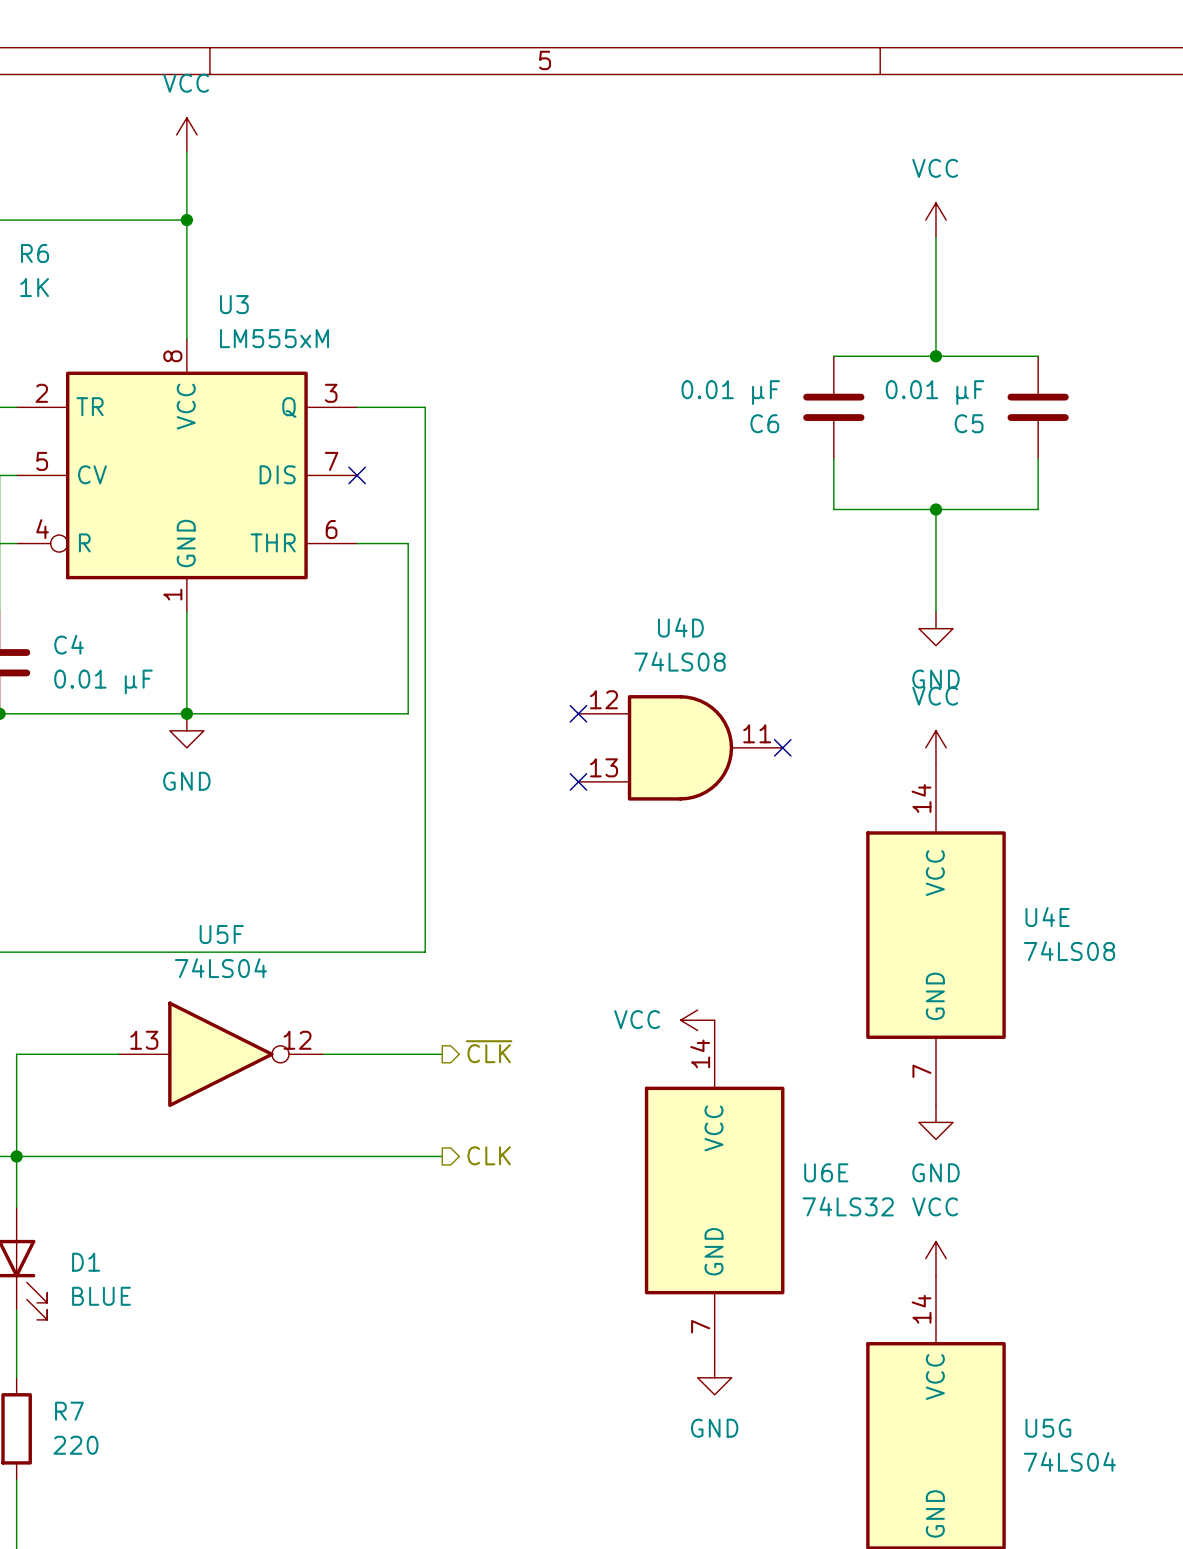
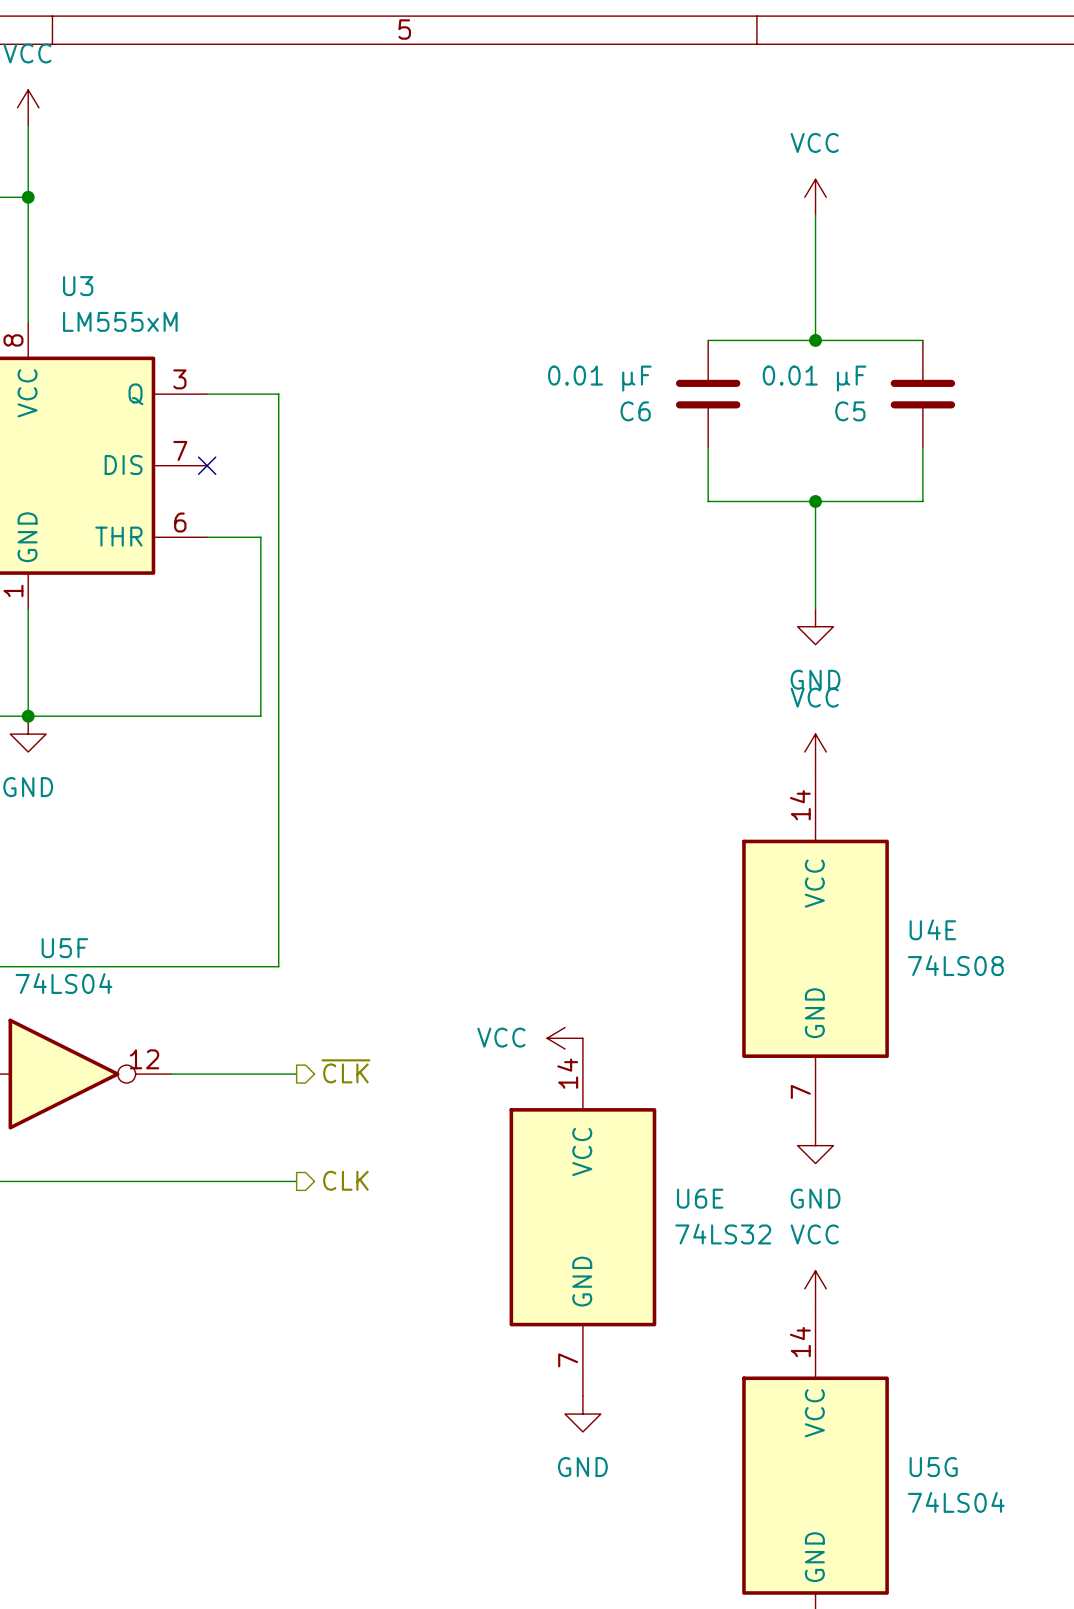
no-connect mark: (578, 713) -> none
U4D: 74LS08 (680, 747) -> none
no-connect mark: (782, 747) -> none
no-connect mark: (578, 781) -> none

